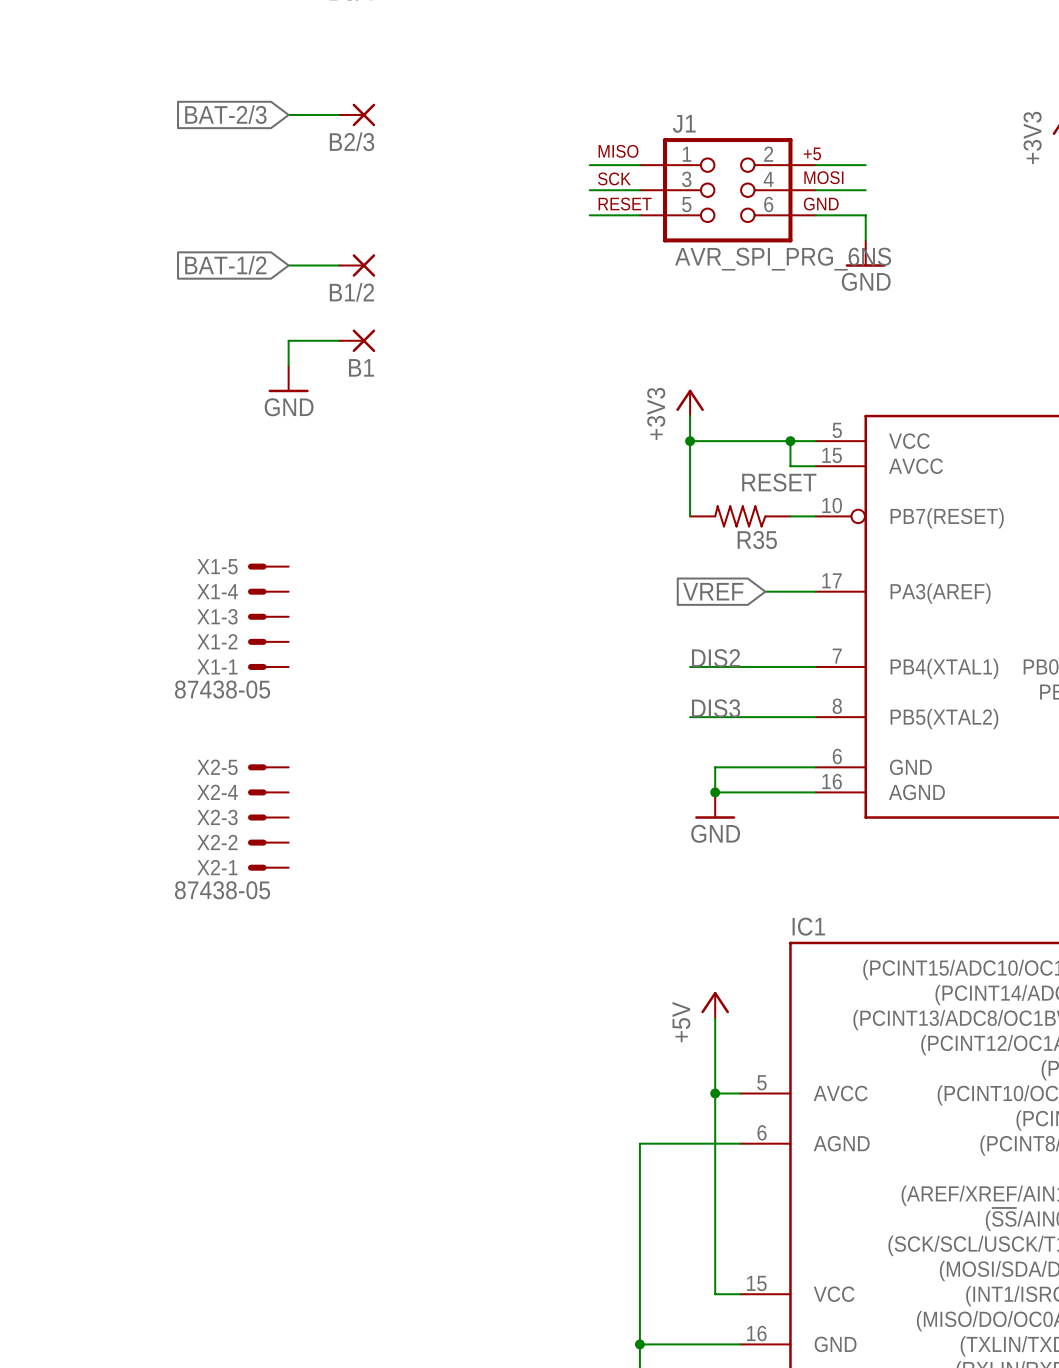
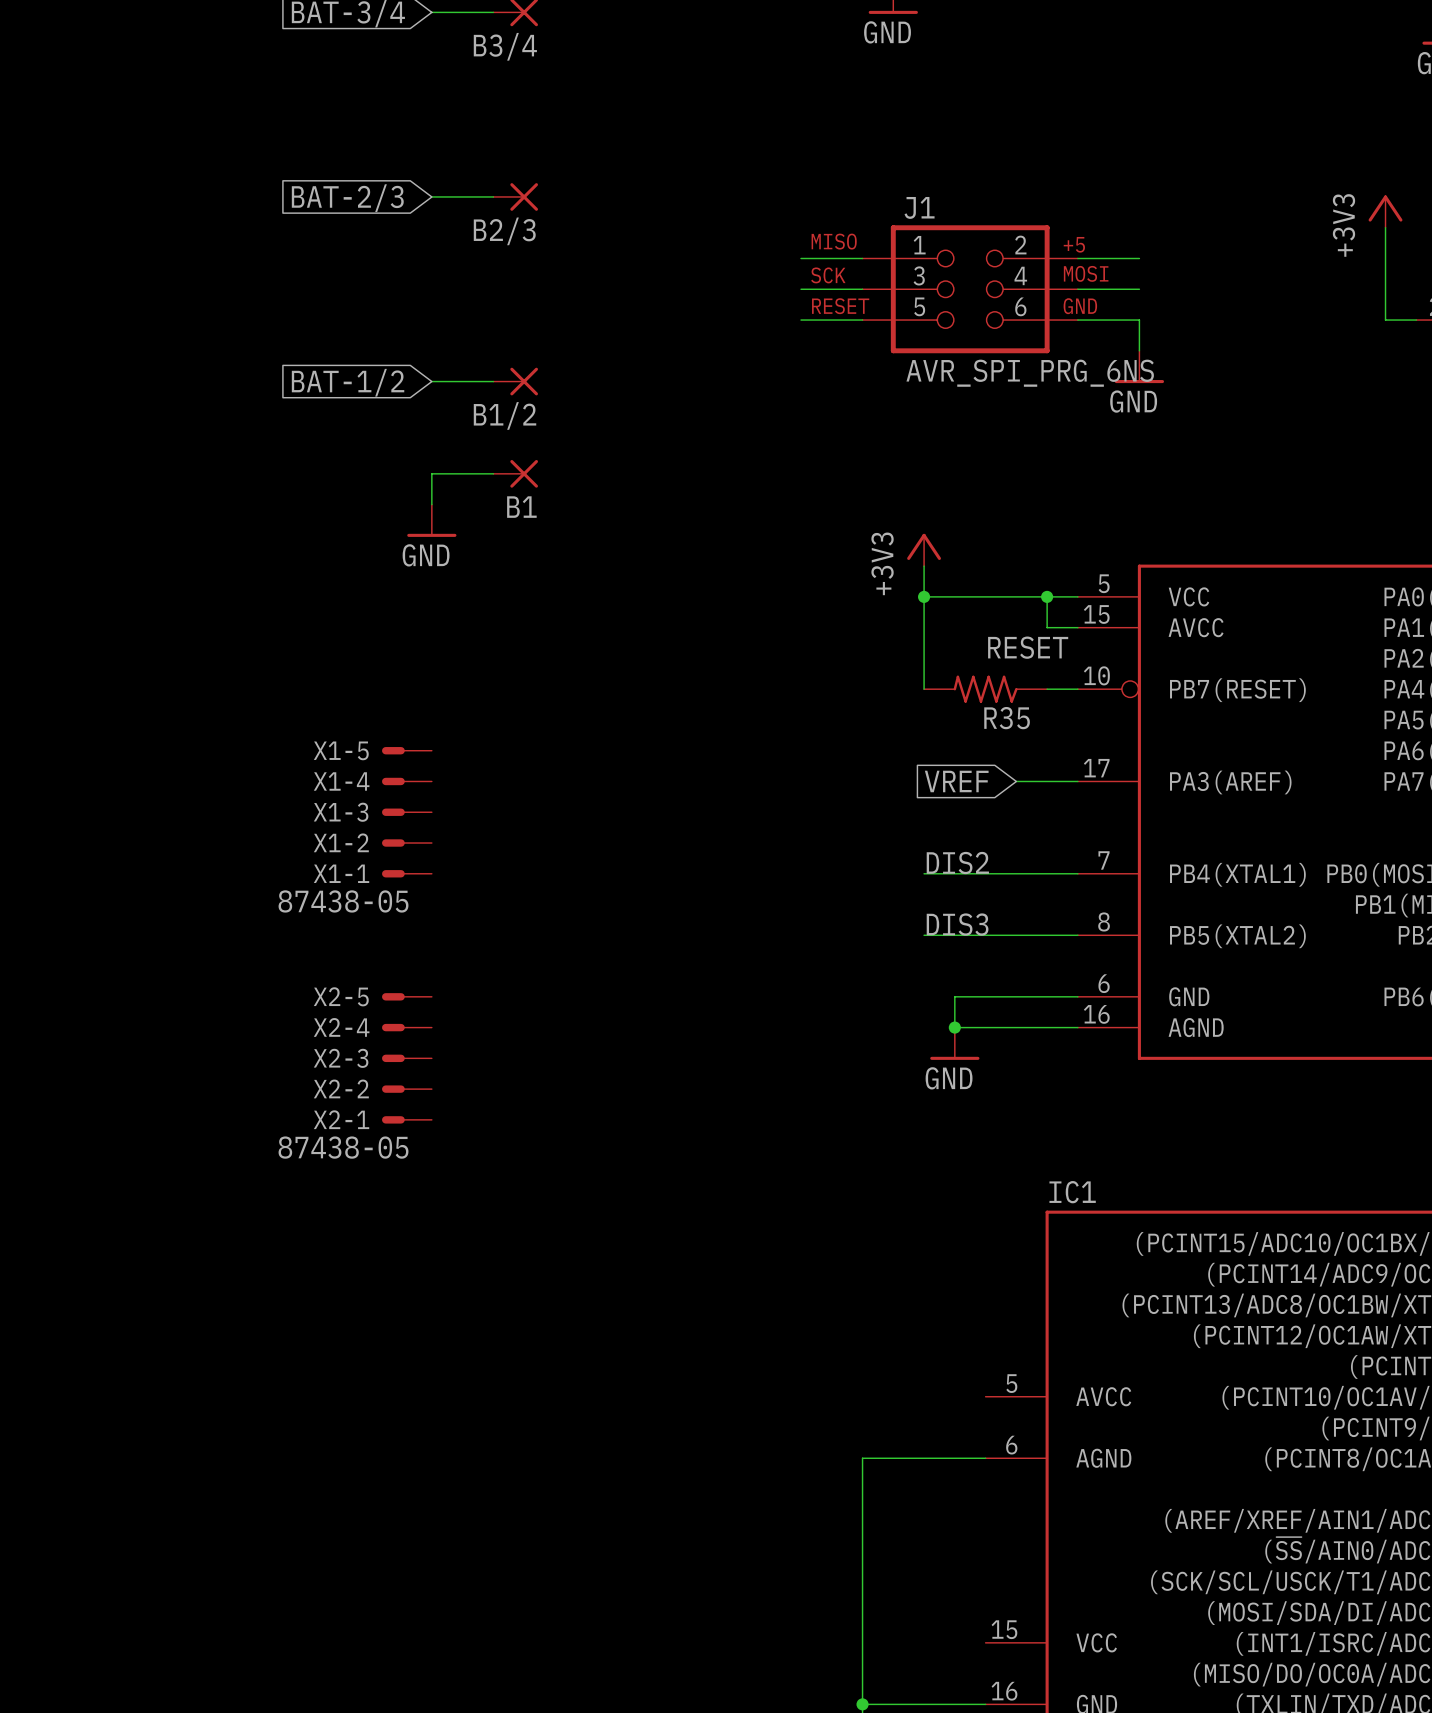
power symbol: +5V (715, 1005) -> none
wire: (715, 1018) (715, 1294) (740, 1294) -> none
wire: (715, 1093) (740, 1093) -> none
junction: (715, 1093) -> none

